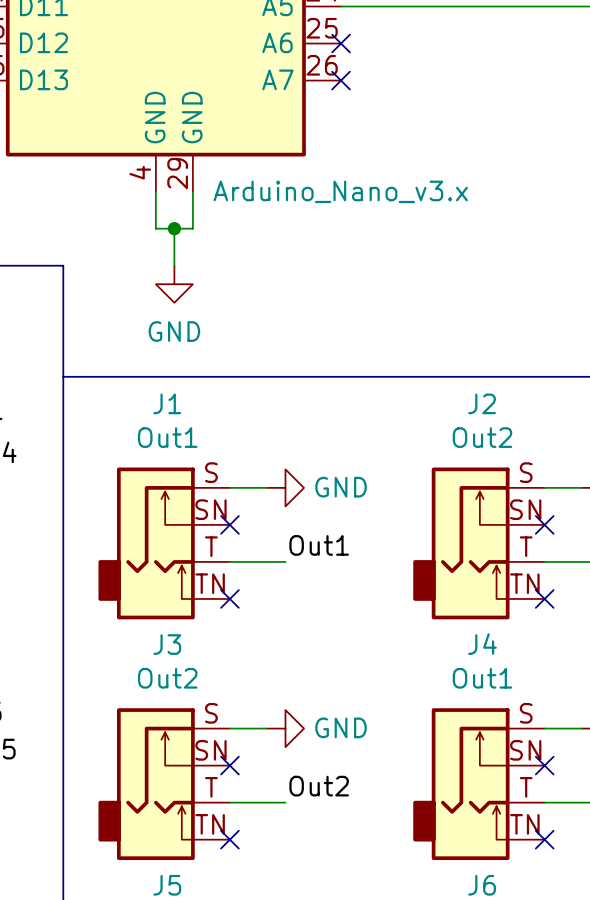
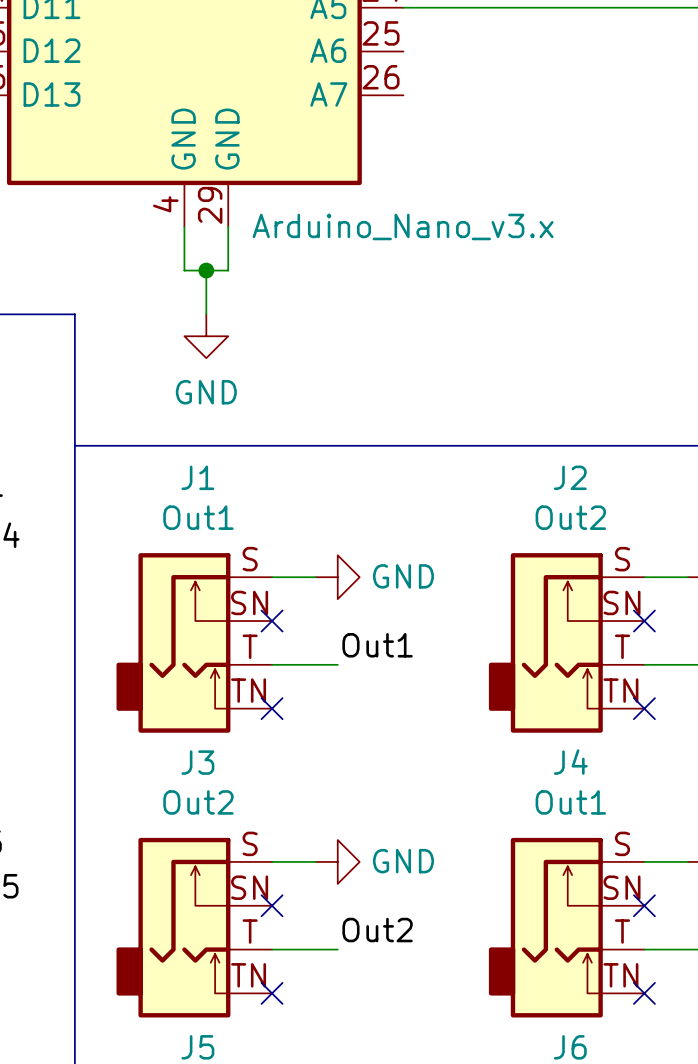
no-connect mark: (341, 43) -> none
no-connect mark: (341, 80) -> none

